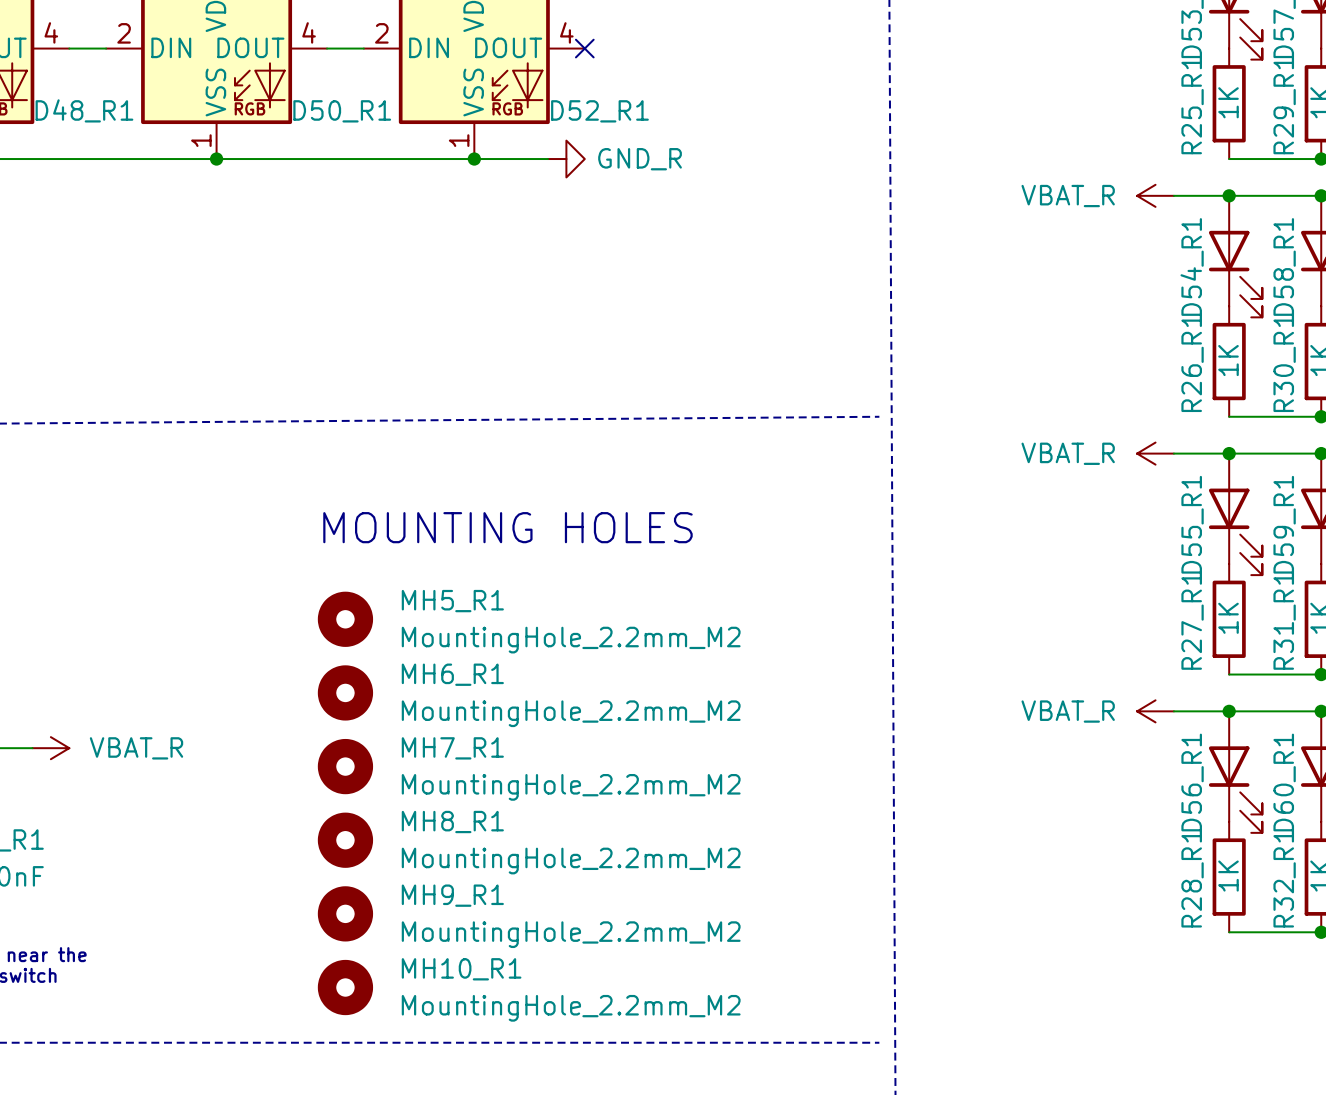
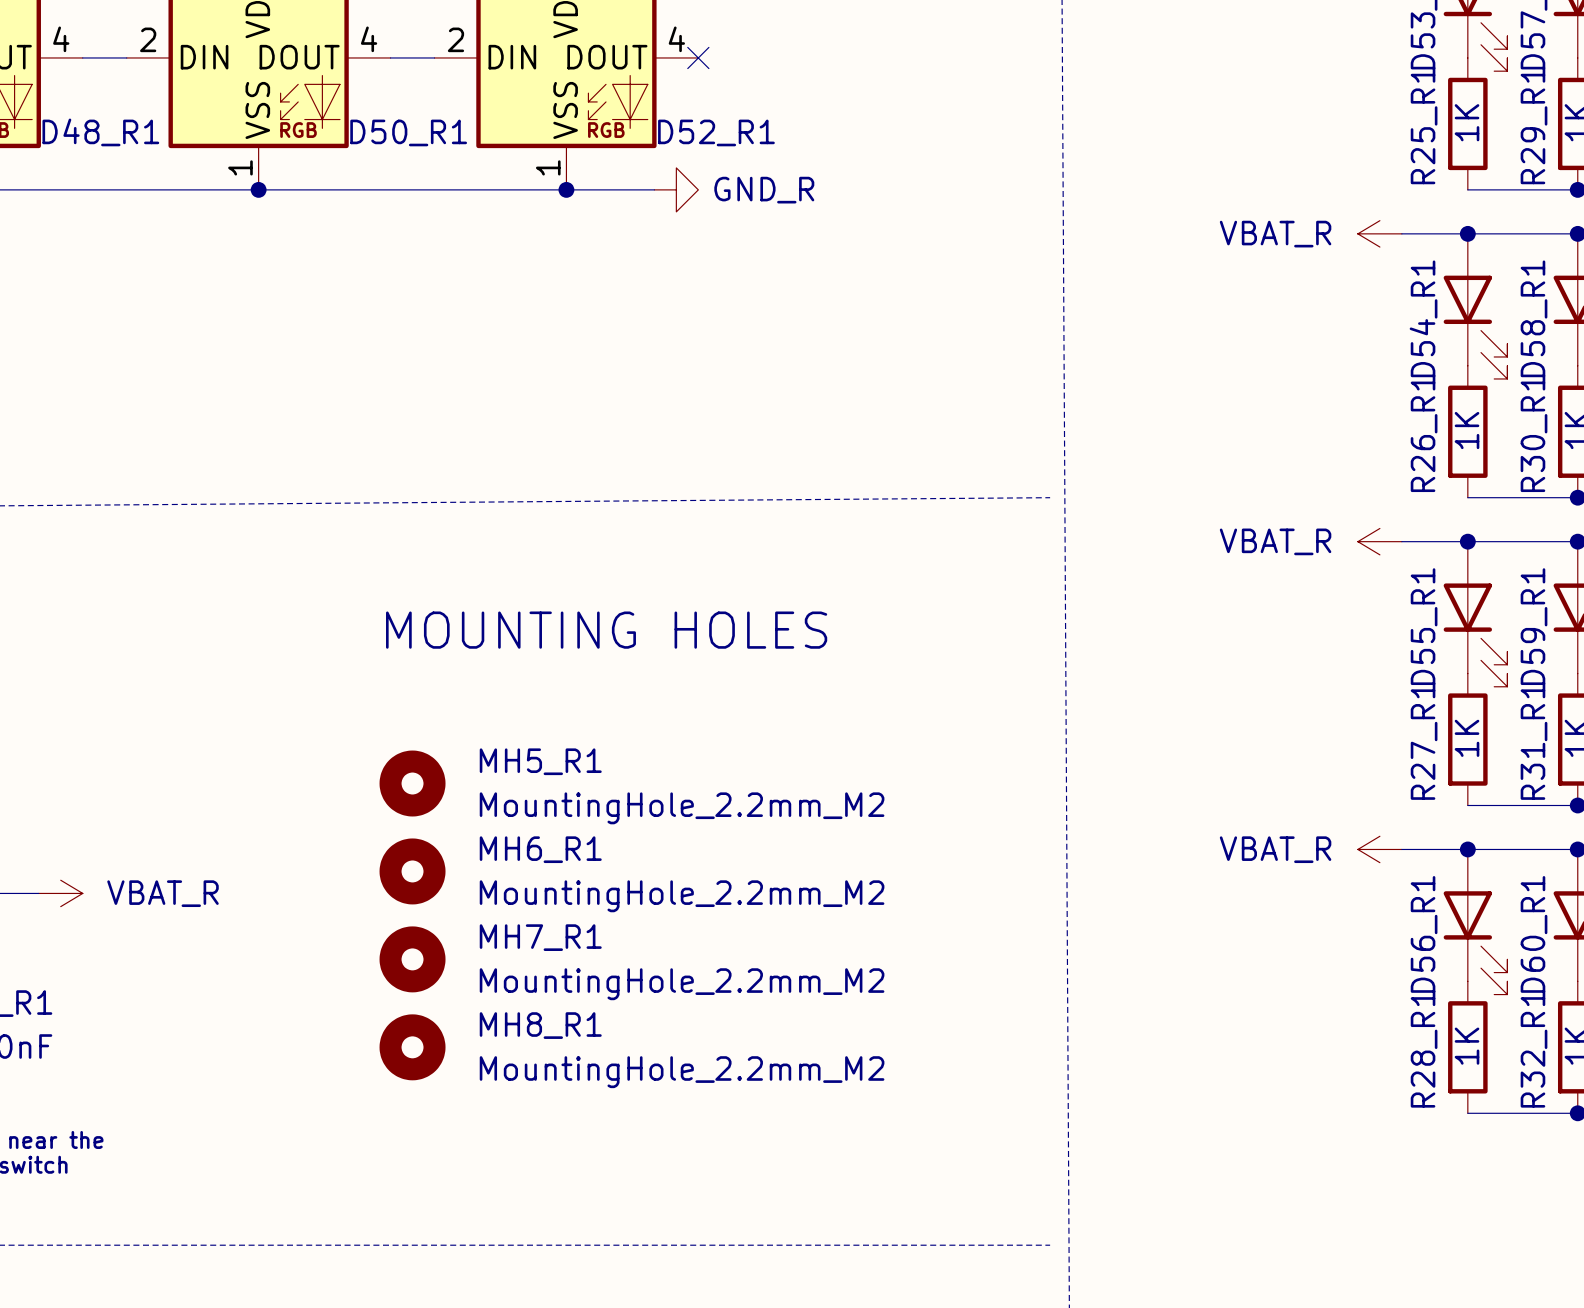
MH5_R1 position: (345, 619) -> (412, 783)
MH6_R1 position: (345, 692) -> (412, 871)
MH7_R1 position: (345, 766) -> (412, 959)
MH8_R1 position: (345, 840) -> (412, 1047)
MH9_R1: MountingHole_2.2mm_M2 (345, 913) -> none
MH10_R1: MountingHole_2.2mm_M2 (345, 987) -> none

